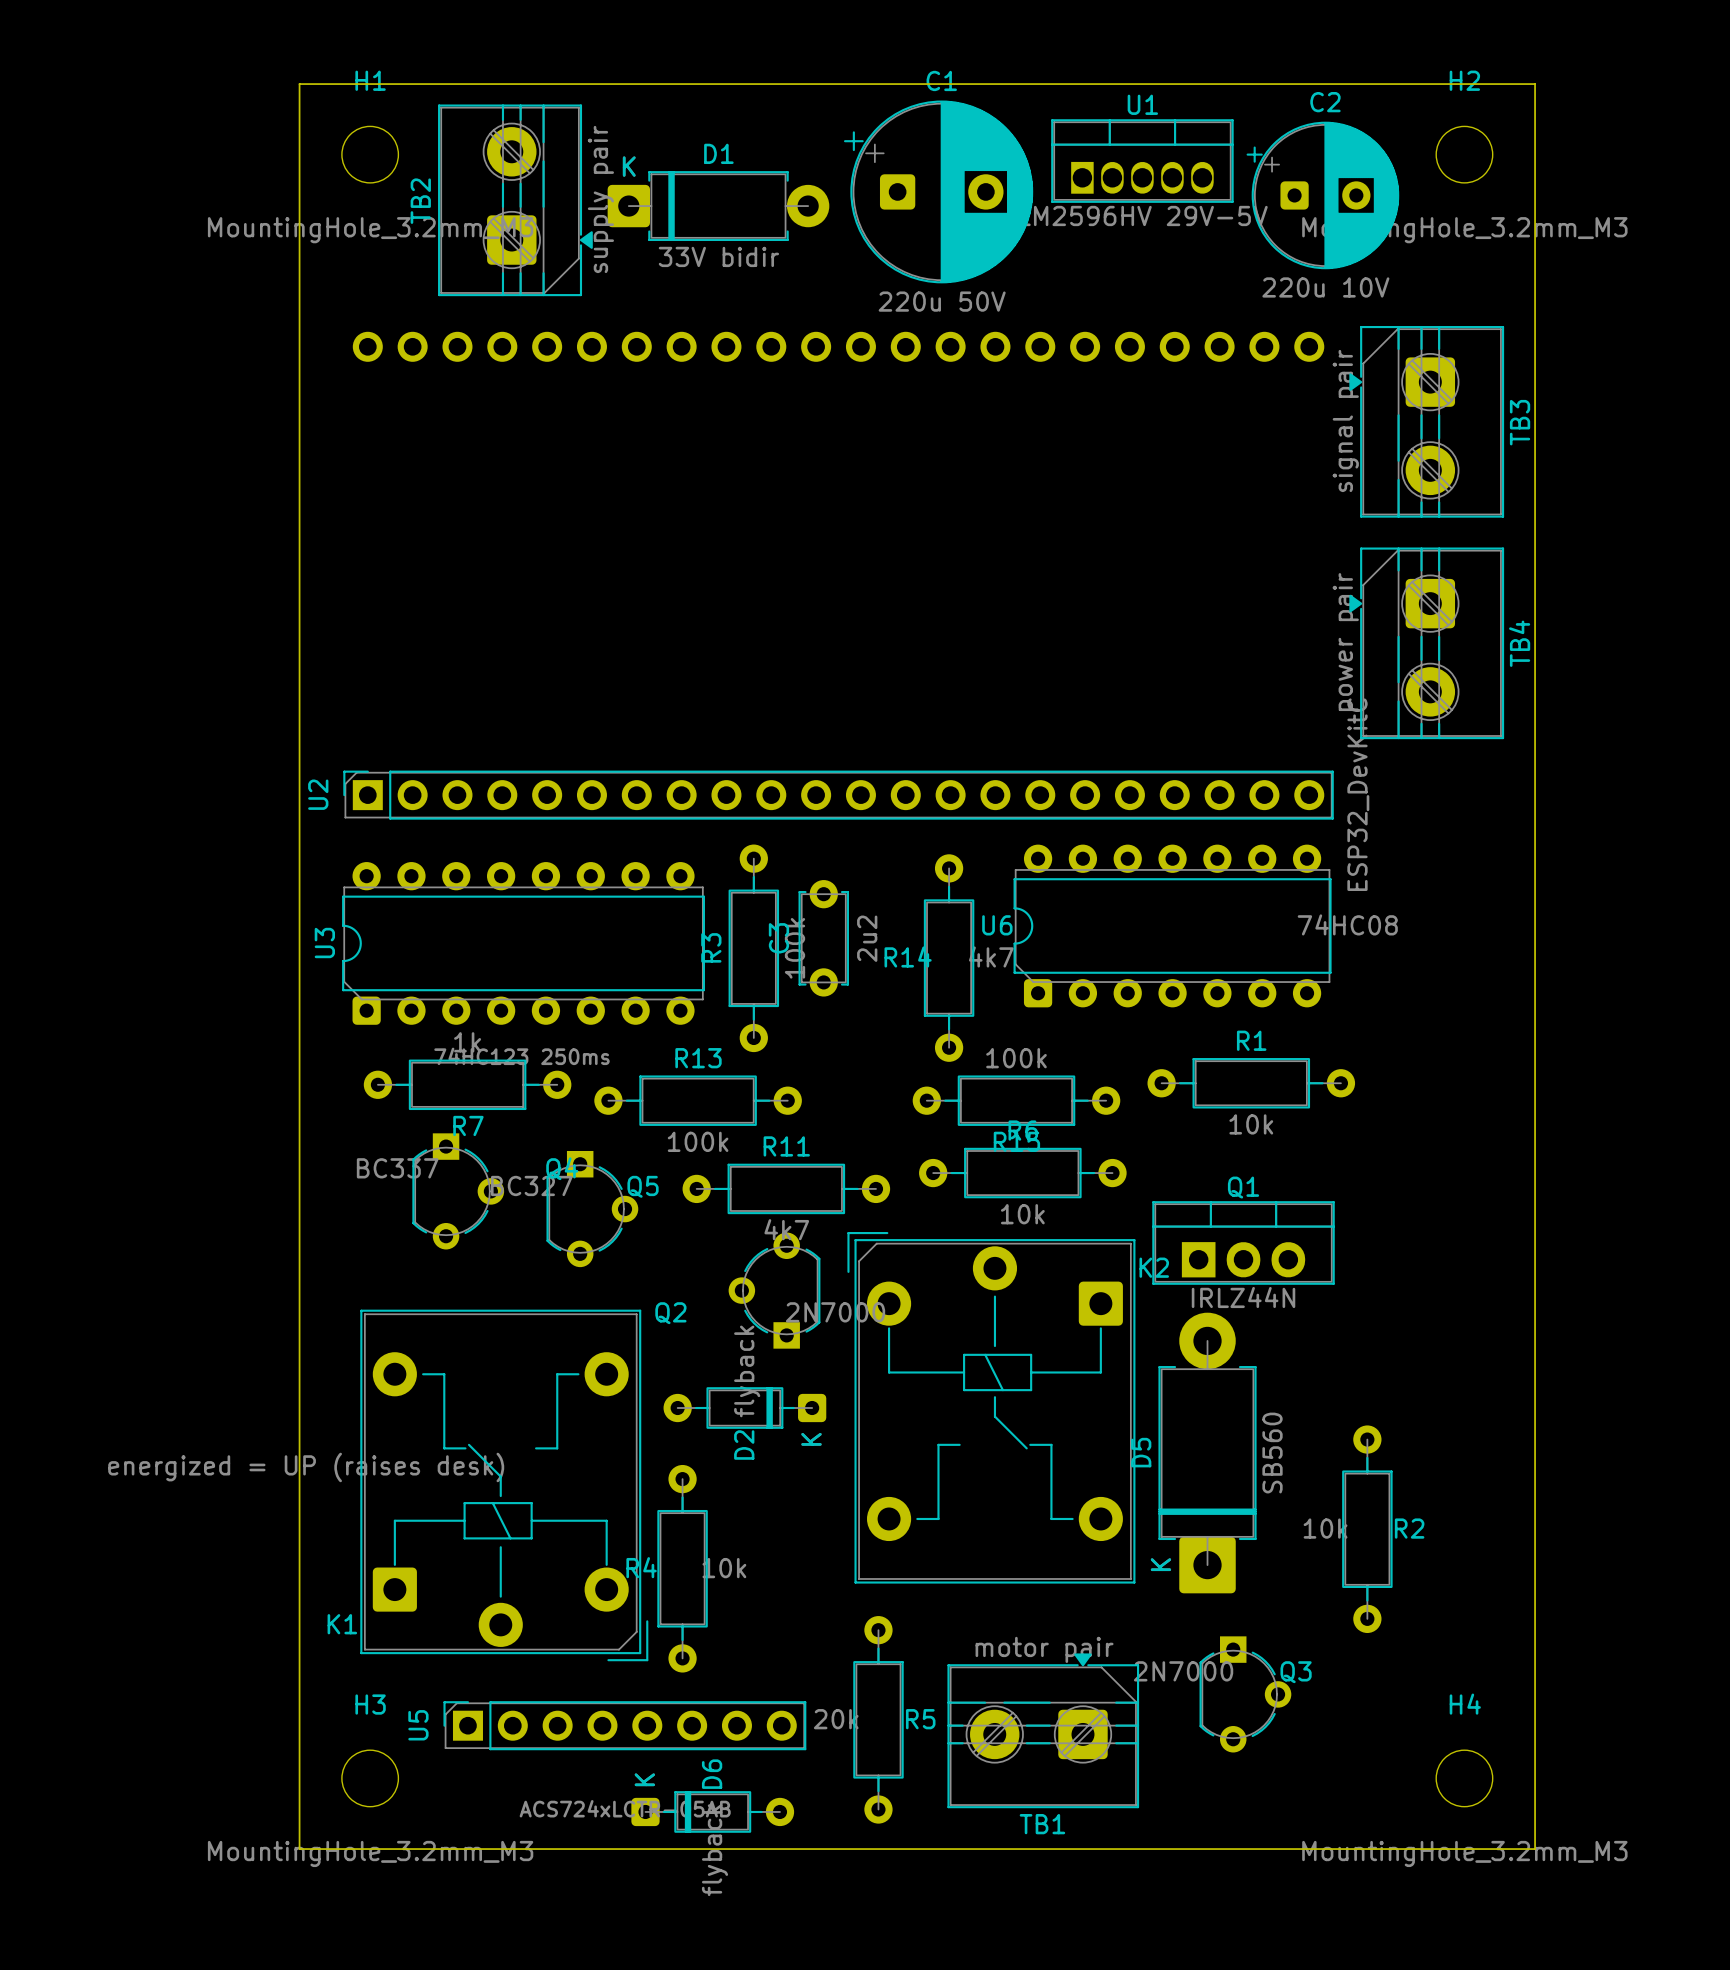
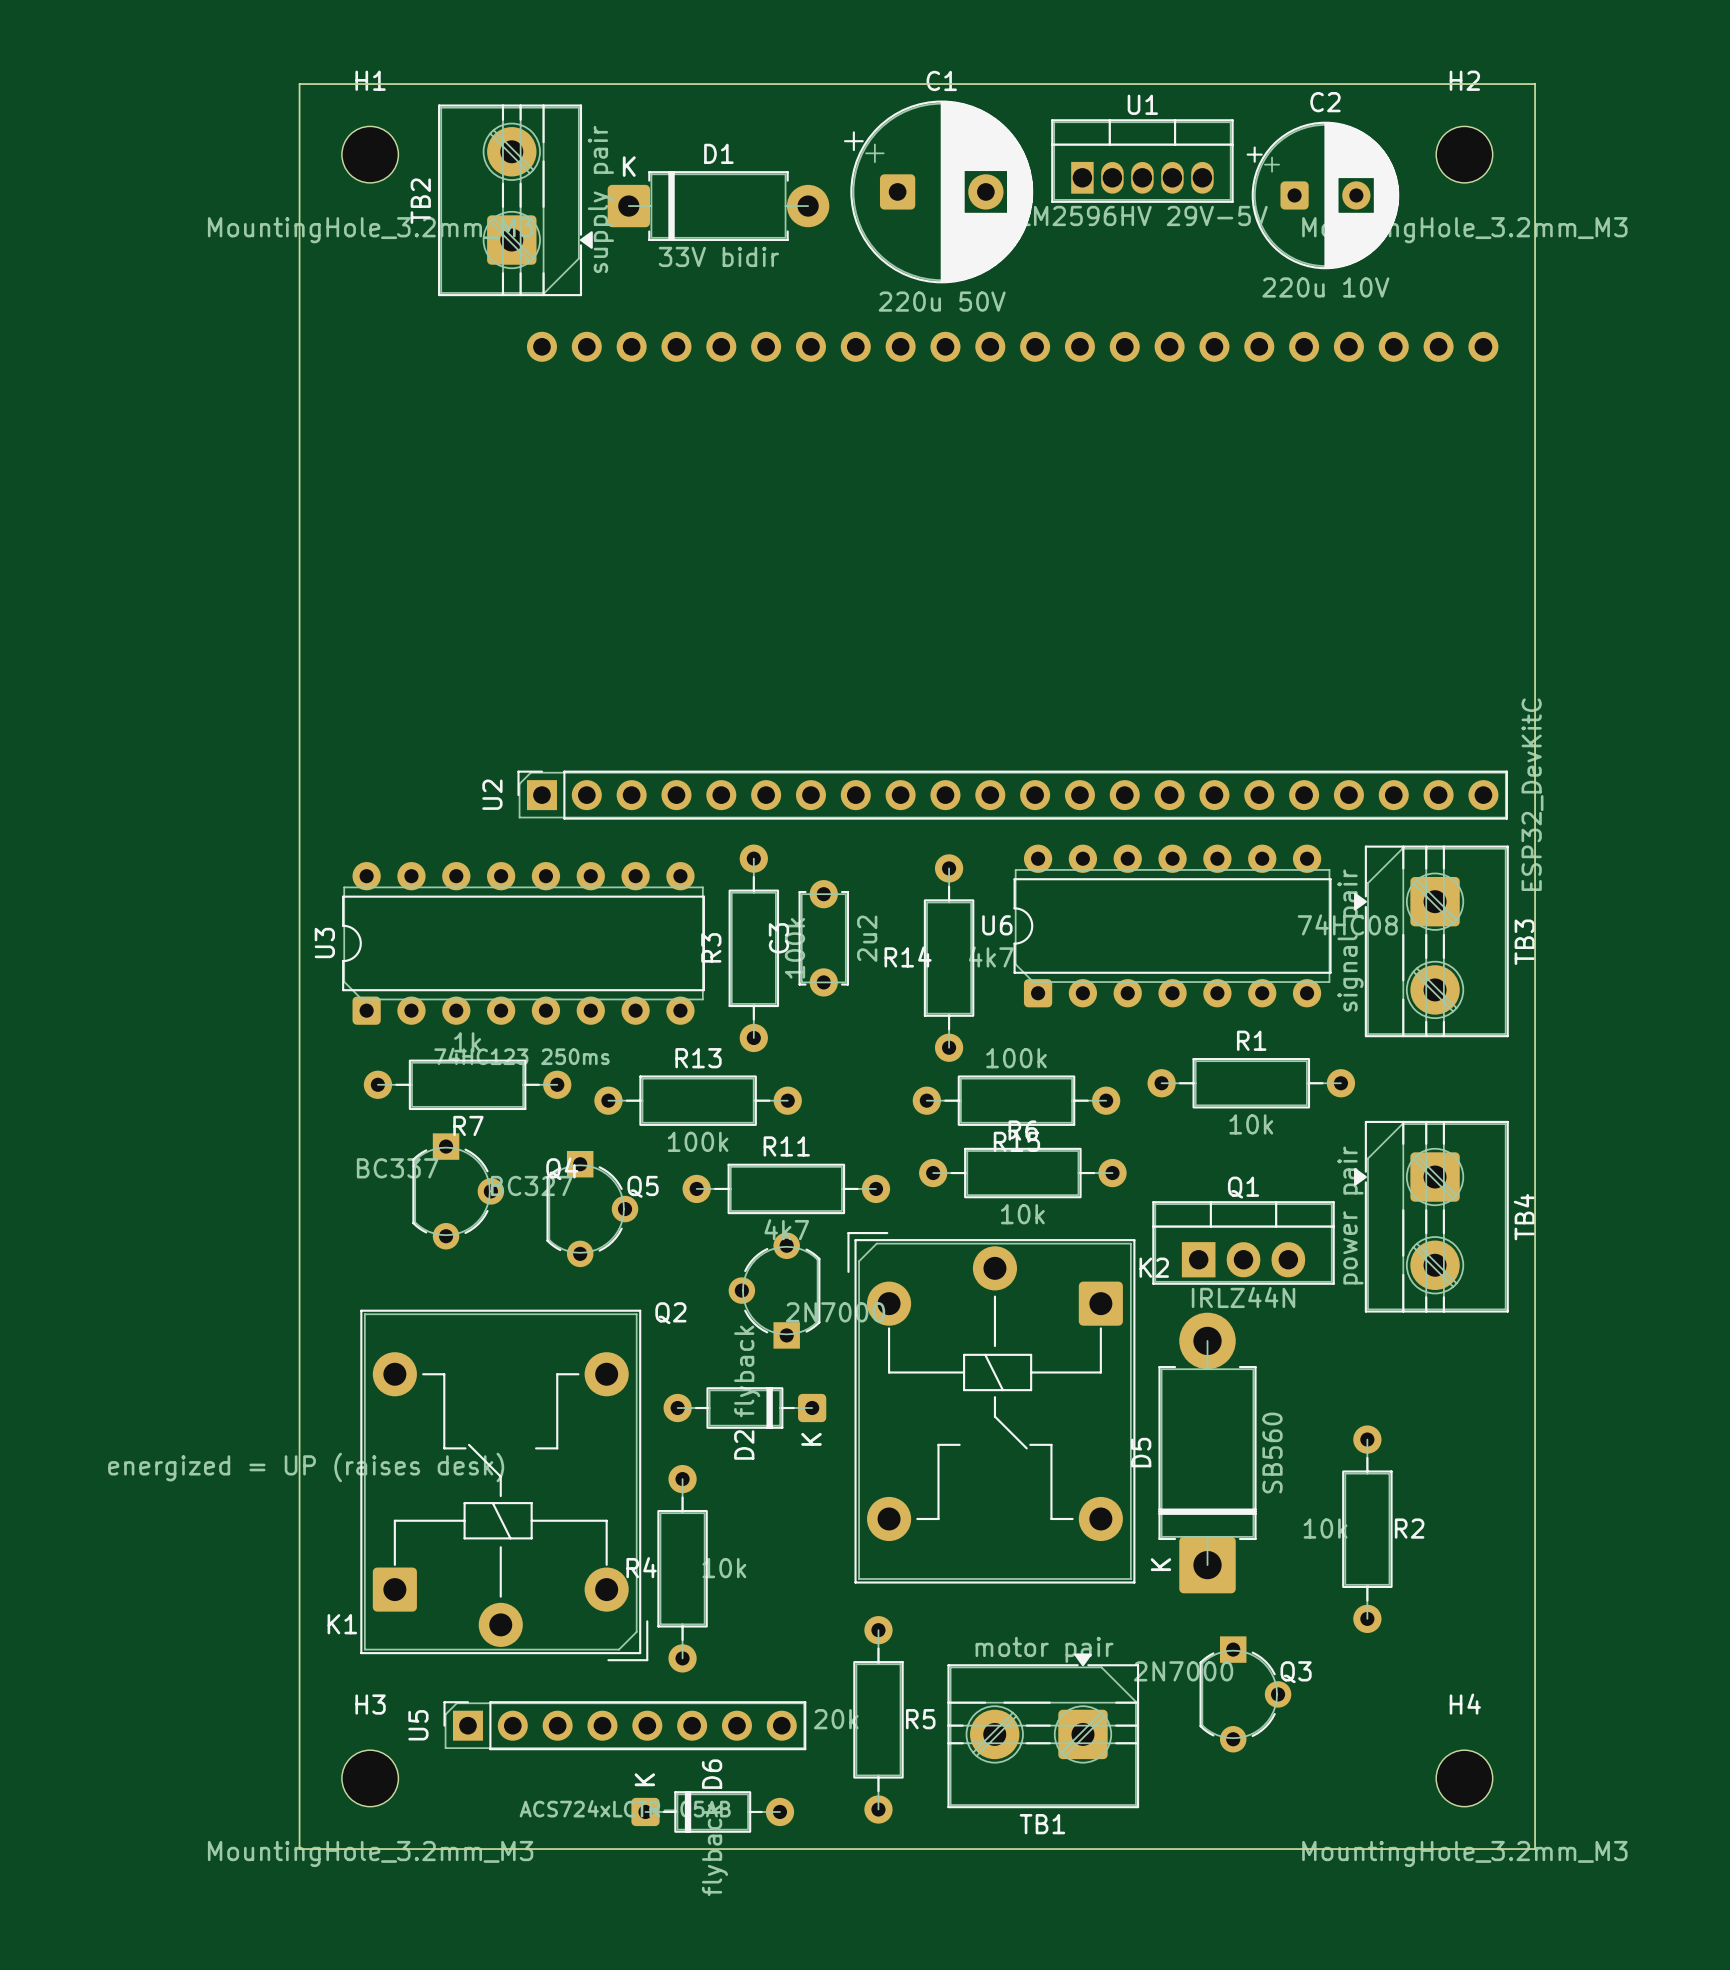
TB3 position: (1426, 421) -> (1431, 941)
U2 position: (838, 575) -> (1012, 575)
TB4 position: (1426, 643) -> (1431, 1216)

